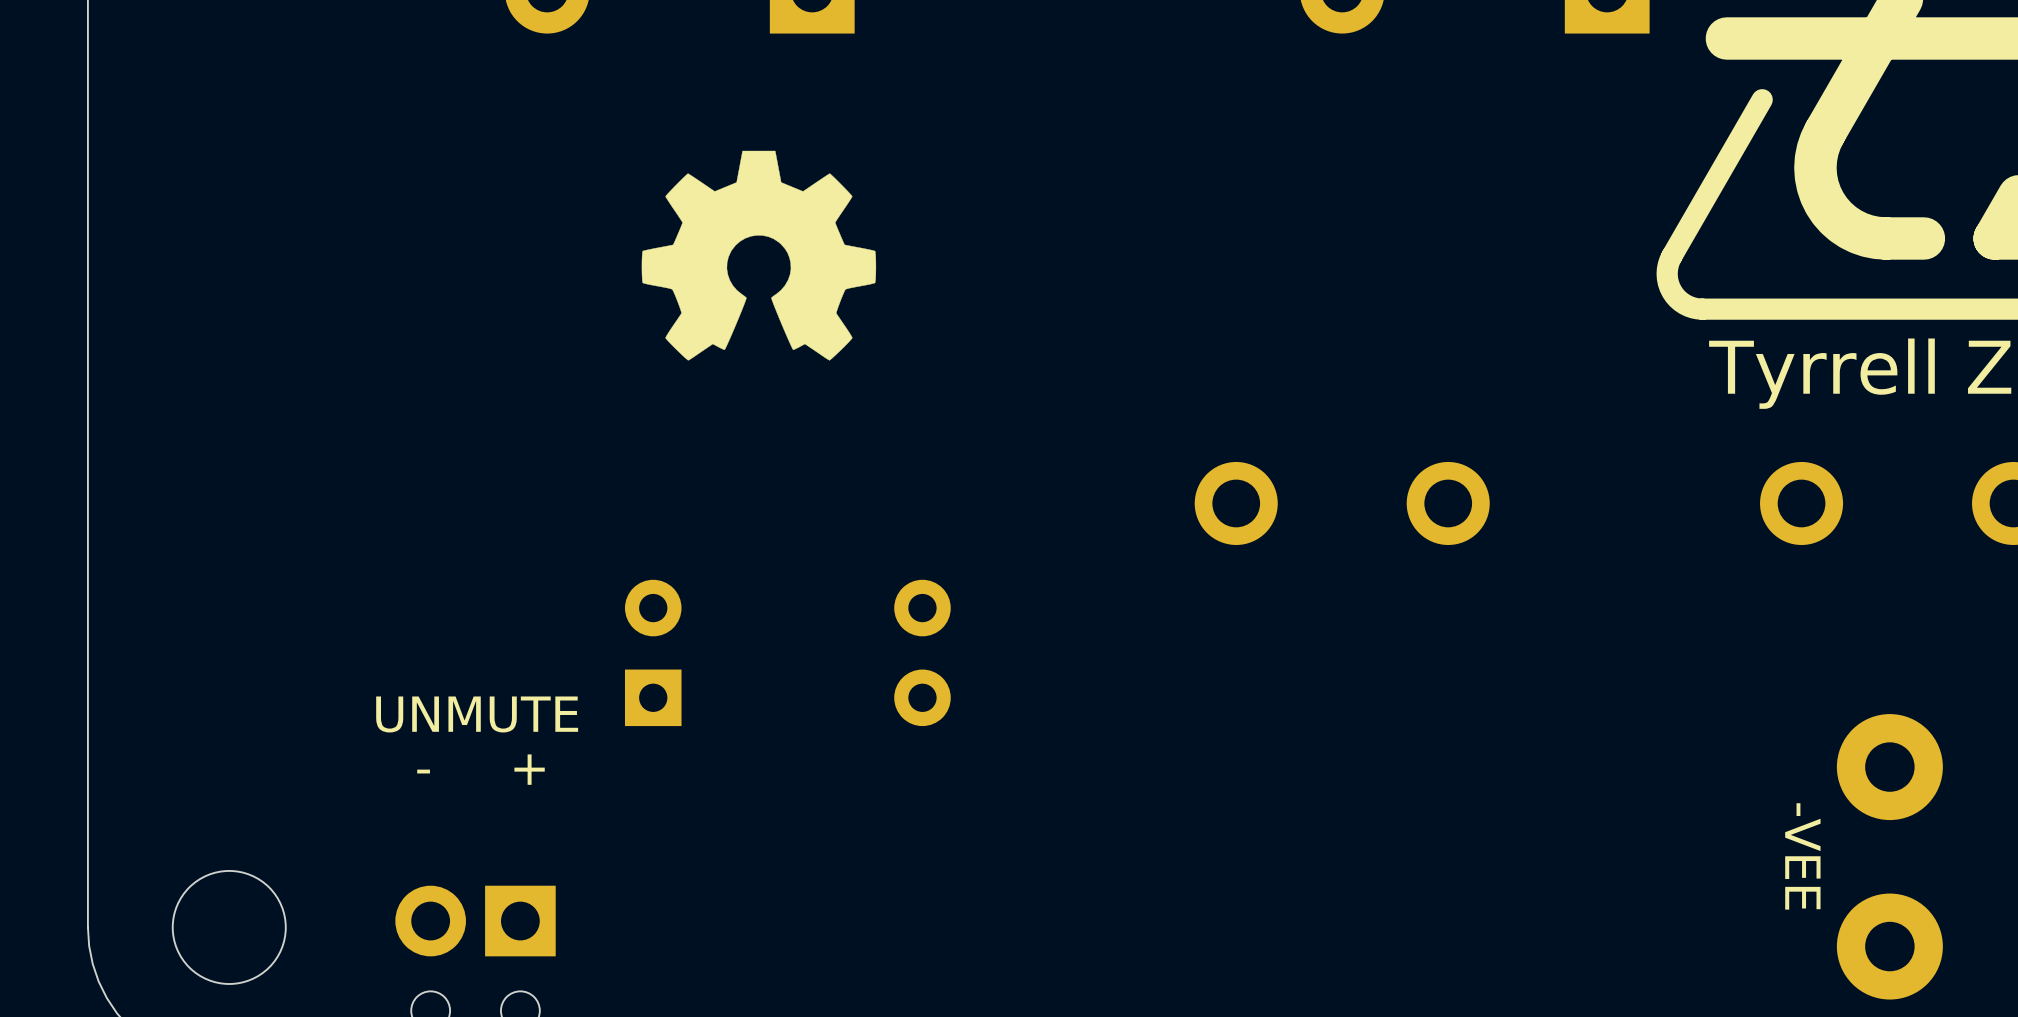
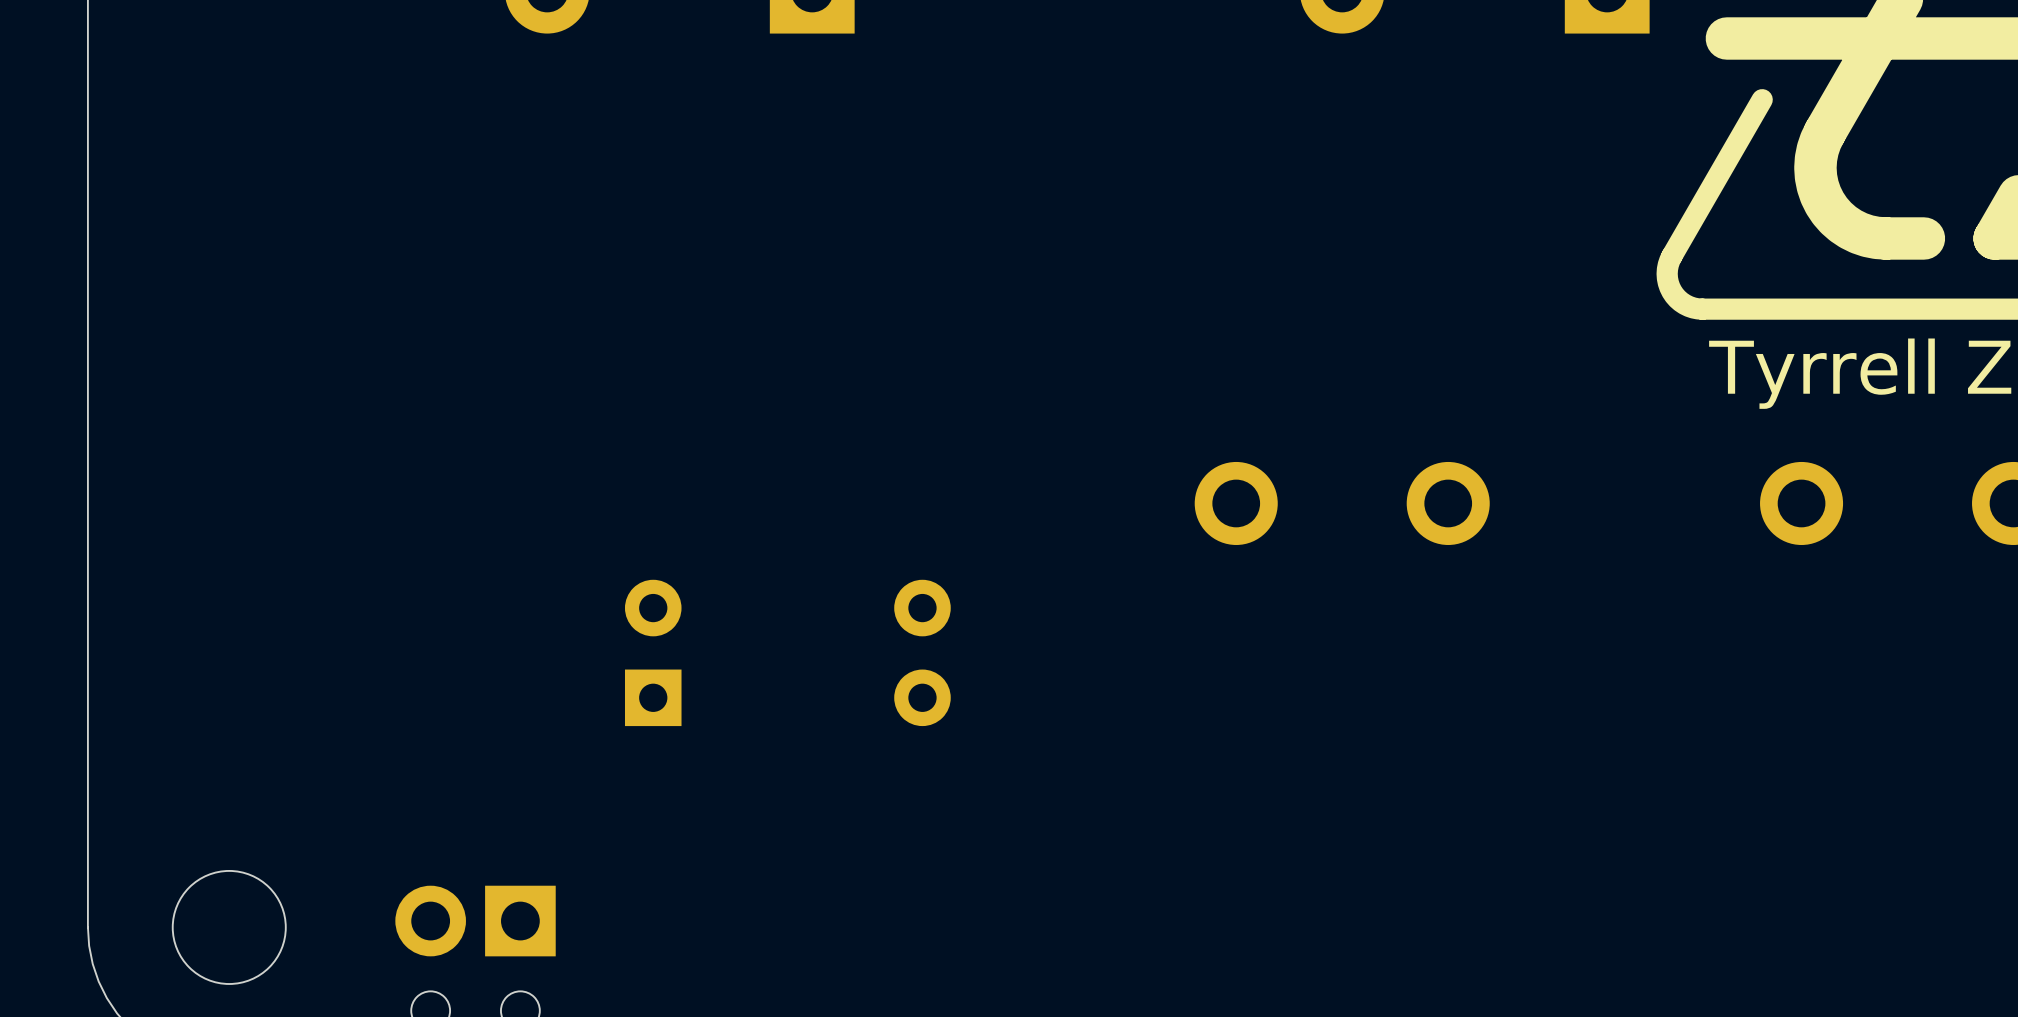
drawing: [641, 150, 877, 361] -> none
text: UNMUTE (477, 714) -> none
text: + (529, 769) -> none
text: - (423, 771) -> none
text: -VEE (1802, 856) -> none
part: (1889, 856) -> none

